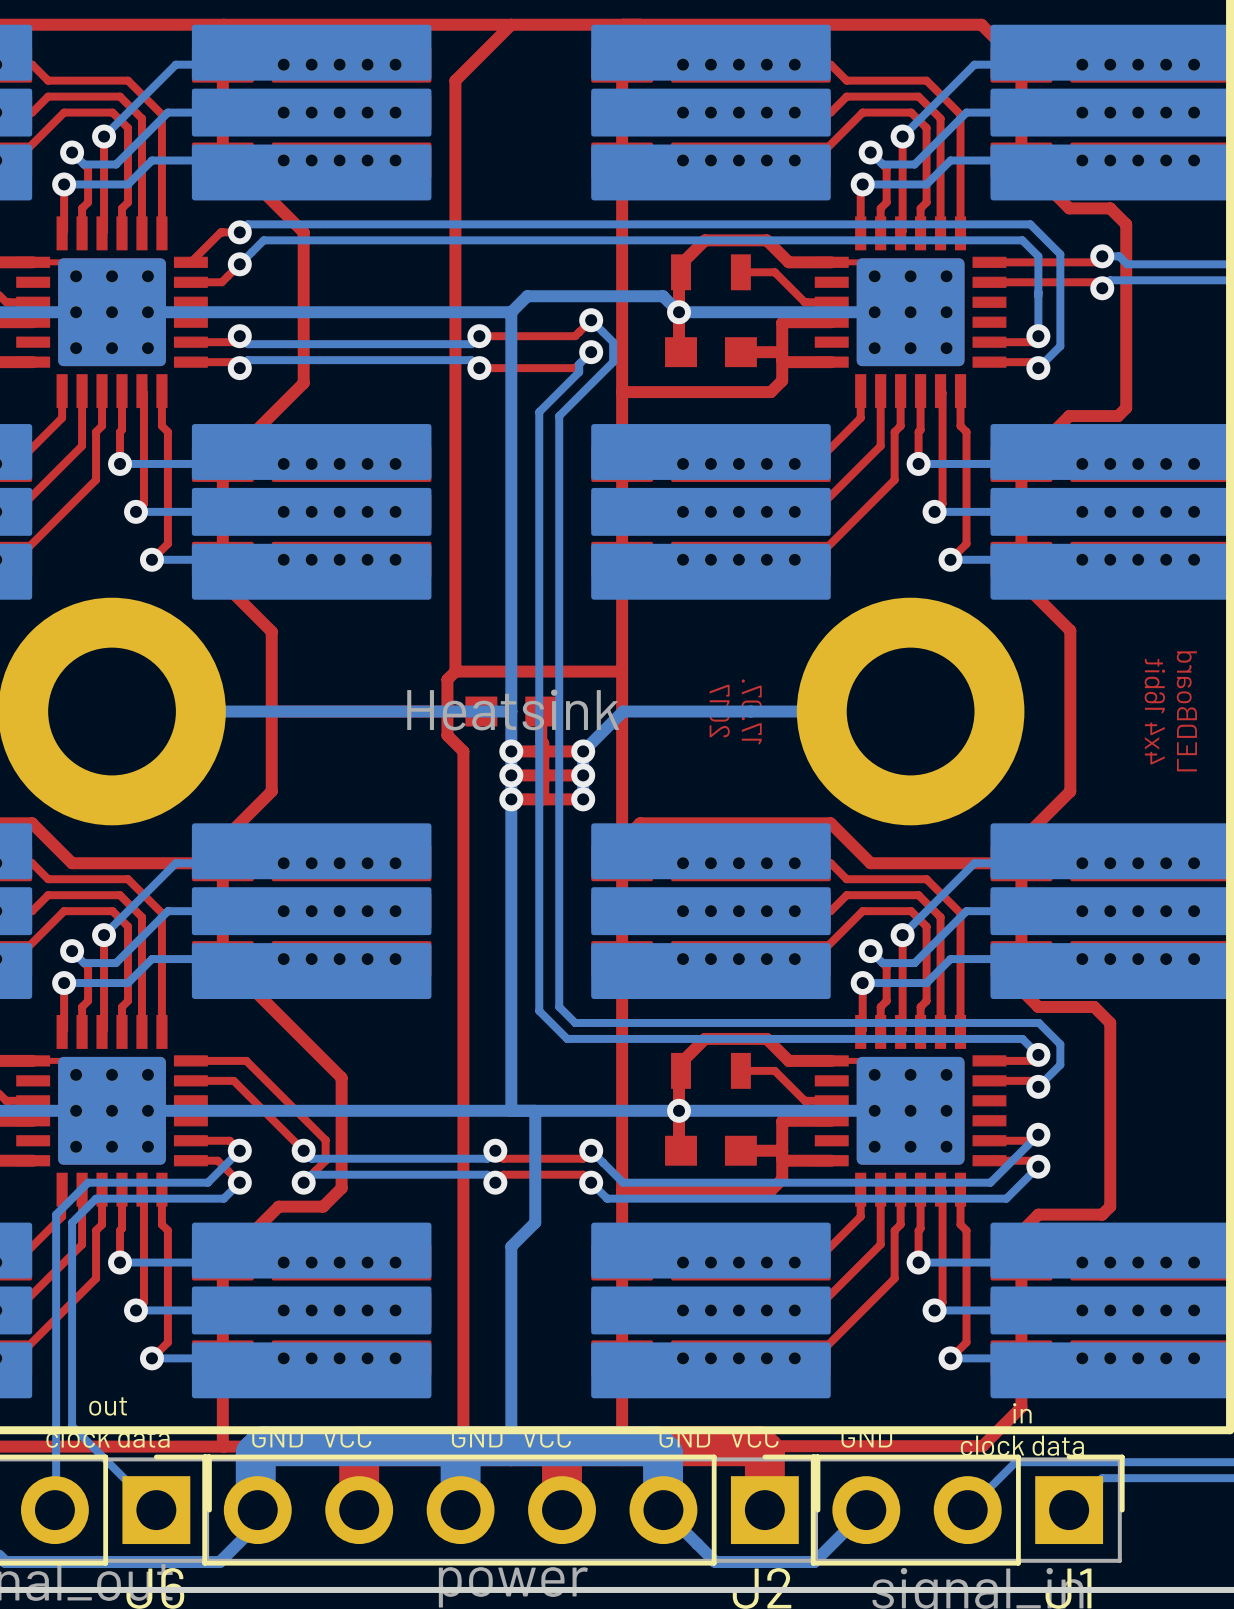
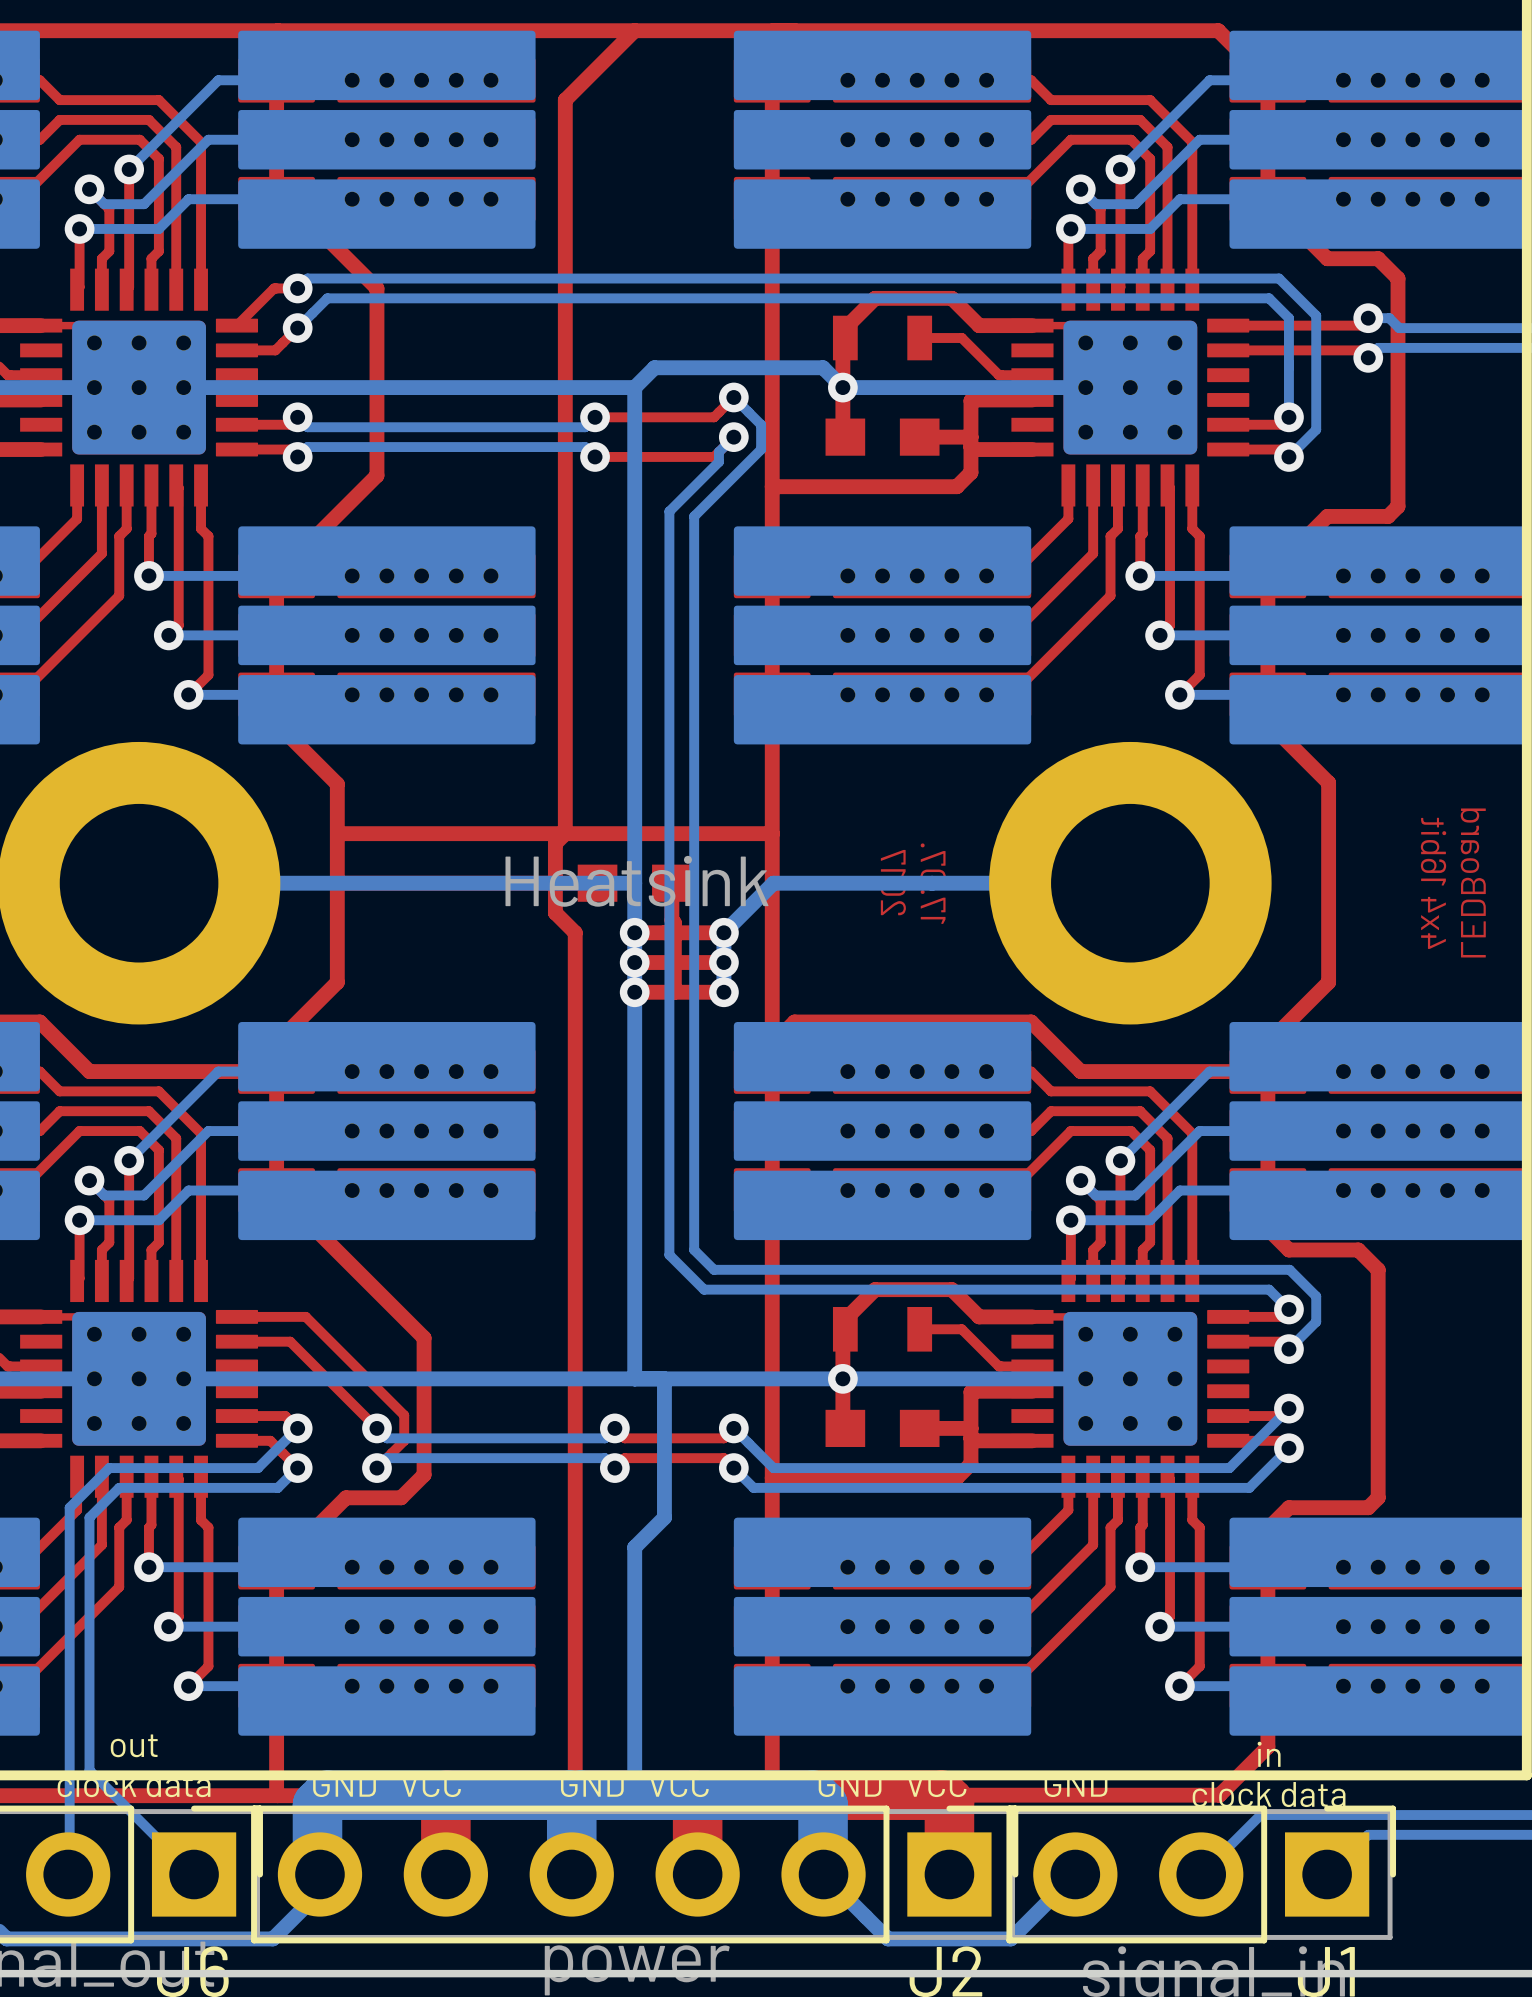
top track: none -> (560, 833) (337, 833)

